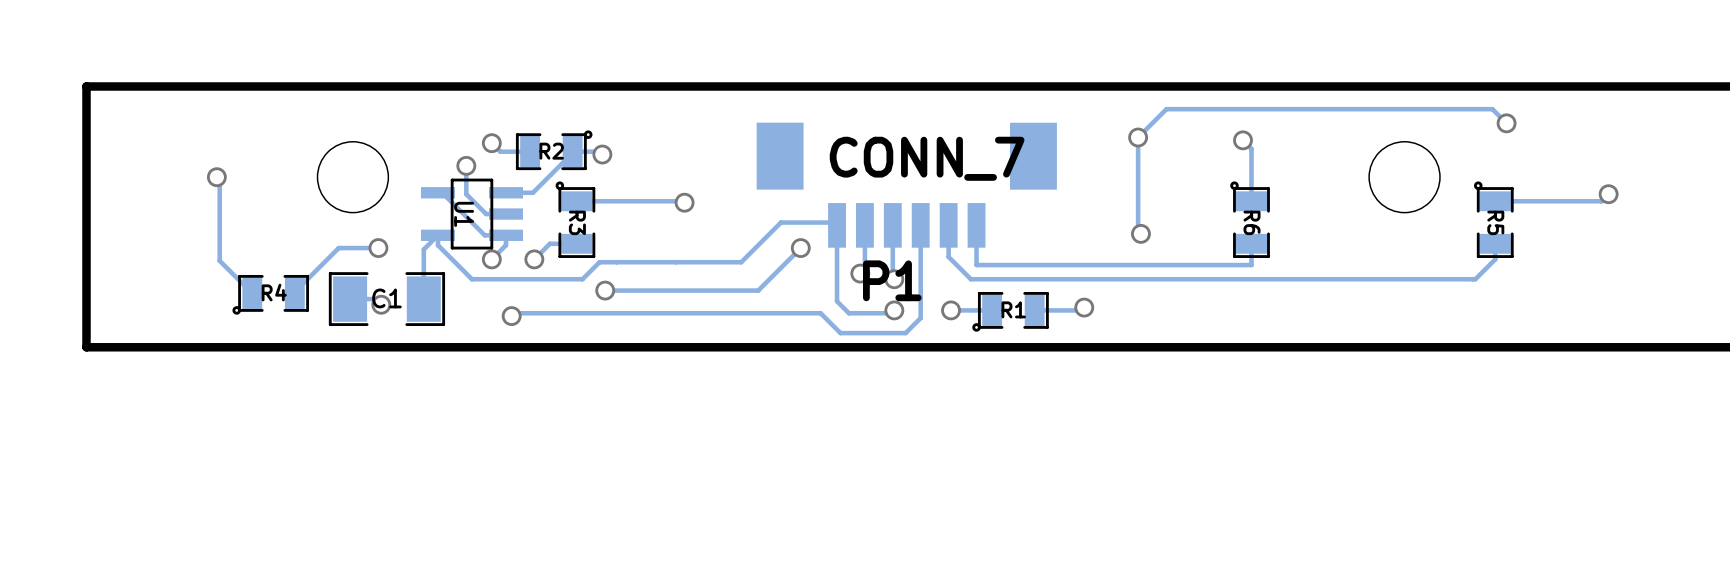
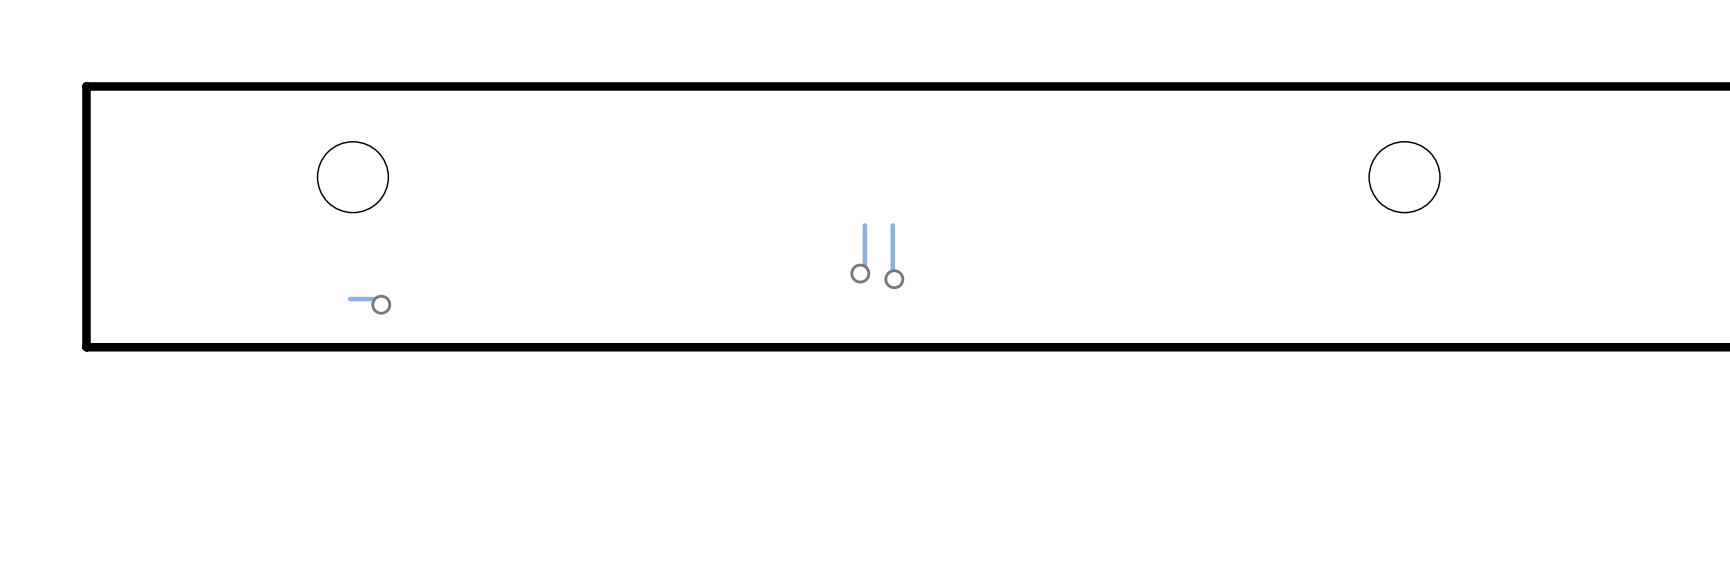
track: (1506, 123) (1492, 109) (1166, 109) (1138, 137) (1138, 231) (1140, 233) -> none
via: (1506, 123) -> none
via: (1138, 137) -> none
track: (1242, 140) (1251, 148) (1251, 201) -> none
via: (1242, 140) -> none
track: (491, 143) (500, 151) (530, 151) -> none
via: (491, 143) -> none
R2: (554, 150) -> none
track: (602, 154) (599, 151) (572, 151) (532, 192) (506, 192) -> none
via: (602, 154) -> none
track: (466, 165) (466, 194) (486, 214) (506, 214) -> none
via: (466, 165) -> none
track: (216, 177) (219, 180) (219, 260) (252, 293) -> none
via: (216, 177) -> none
P1: CONN_7 (906, 185) -> none
track: (437, 192) (442, 192) (484, 235) (506, 235) (506, 245) (491, 259) -> none
track: (1608, 194) (1601, 201) (1495, 201) -> none
via: (1608, 194) -> none
track: (576, 201) (684, 202) -> none
via: (684, 202) -> none
U1: (471, 214) -> none
R3: (575, 219) -> none
R6: (1250, 219) -> none
R5: (1493, 219) -> none
track: (920, 225) (920, 318) (905, 333) (840, 333) (820, 313) (514, 313) (511, 316) -> none
track: (948, 225) (948, 257) (970, 279) (1475, 279) (1495, 259) (1495, 243) -> none
track: (976, 225) (976, 265) (1251, 265) (1251, 243) -> none
via: (1140, 233) -> none
track: (374, 243) (378, 248) (338, 248) (294, 293) -> none
track: (576, 243) (549, 243) (534, 259) -> none
via: (378, 248) -> none
track: (800, 248) (758, 290) (605, 290) -> none
via: (800, 248) -> none
via: (491, 259) -> none
via: (534, 259) -> none
via: (605, 290) -> none
R4: (270, 294) -> none
C1: (386, 299) -> none
track: (423, 299) (423, 249) (437, 235) (437, 245) (471, 279) (582, 279) (599, 262) (741, 262) (780, 222) (834, 222) (837, 225) (837, 301) (848, 313) (891, 313) (894, 310) -> none
track: (1084, 307) (1081, 310) (1034, 310) -> none
via: (1084, 307) -> none
via: (894, 310) -> none
via: (951, 310) -> none
track: (992, 310) (951, 310) -> none
R1: (1010, 311) -> none
via: (511, 316) -> none

